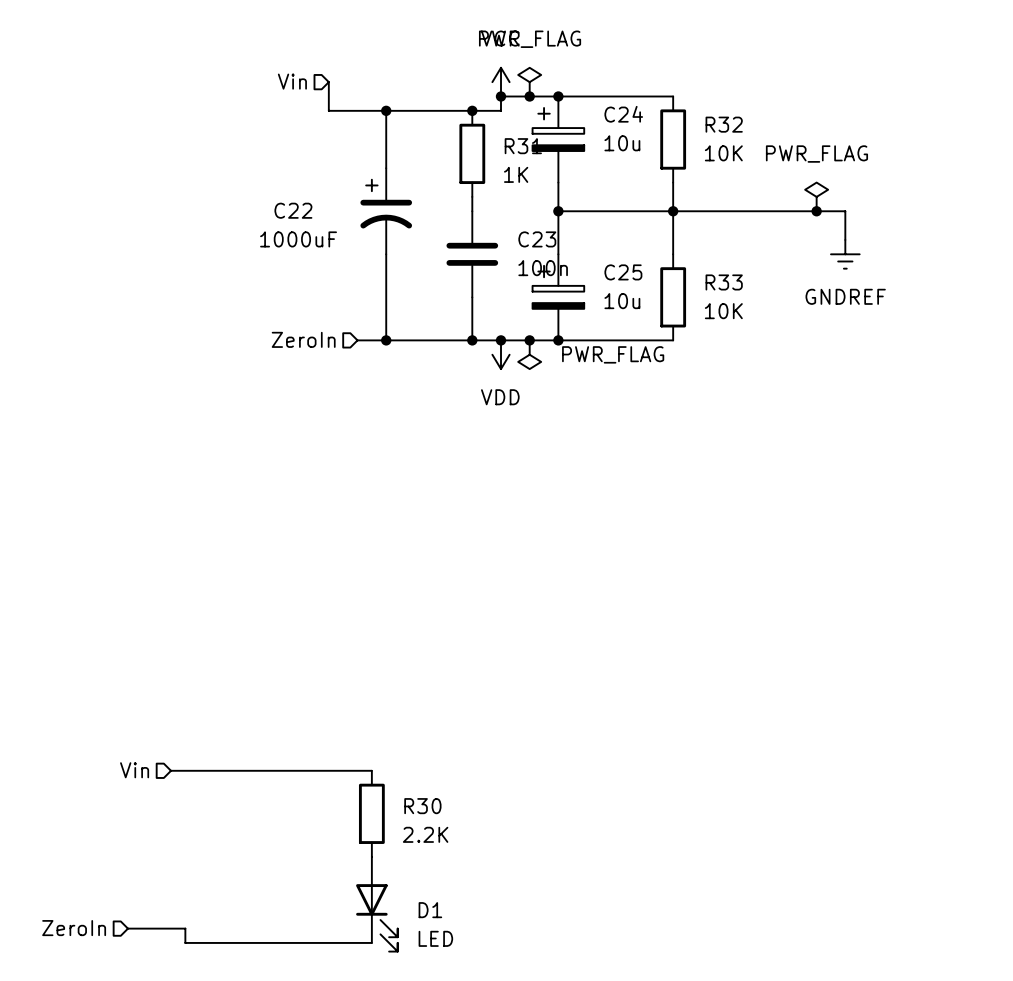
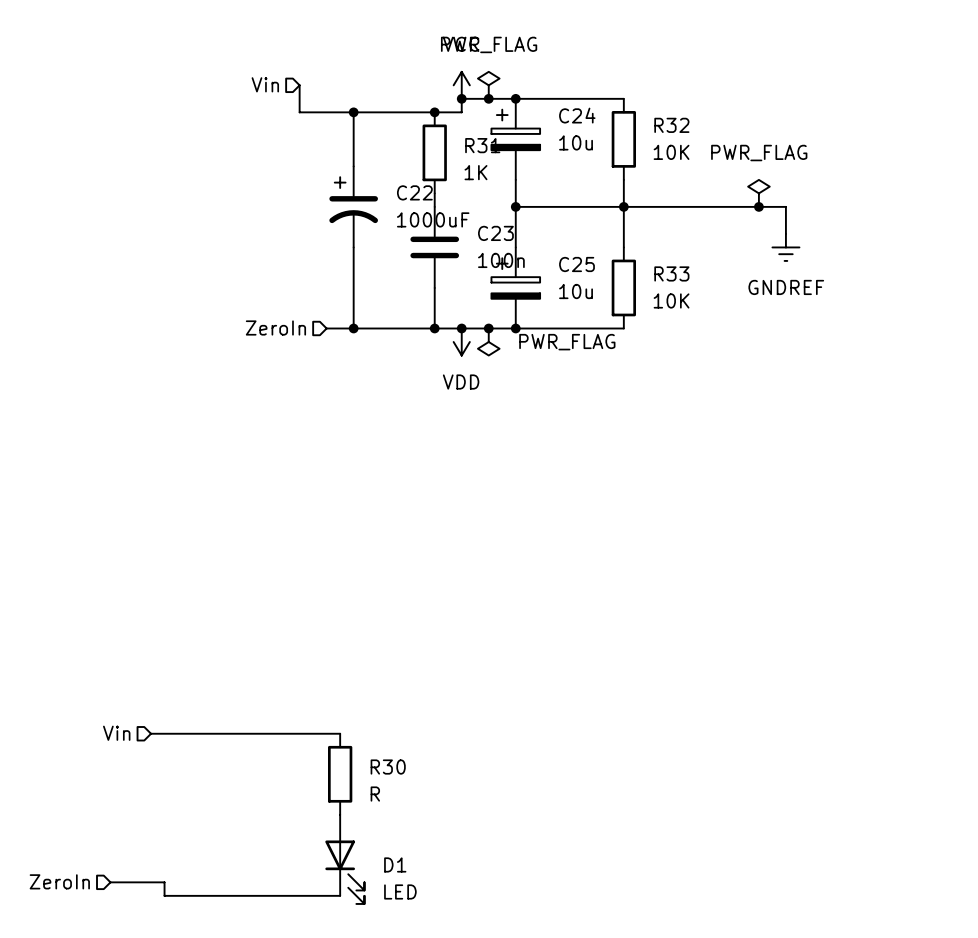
C22 name position: C22 (293, 210) -> C22 (414, 192)
C22 value position: 1000uF (298, 239) -> 1000uF (433, 219)
R30 value: 2.2K (425, 834) -> R (375, 794)

